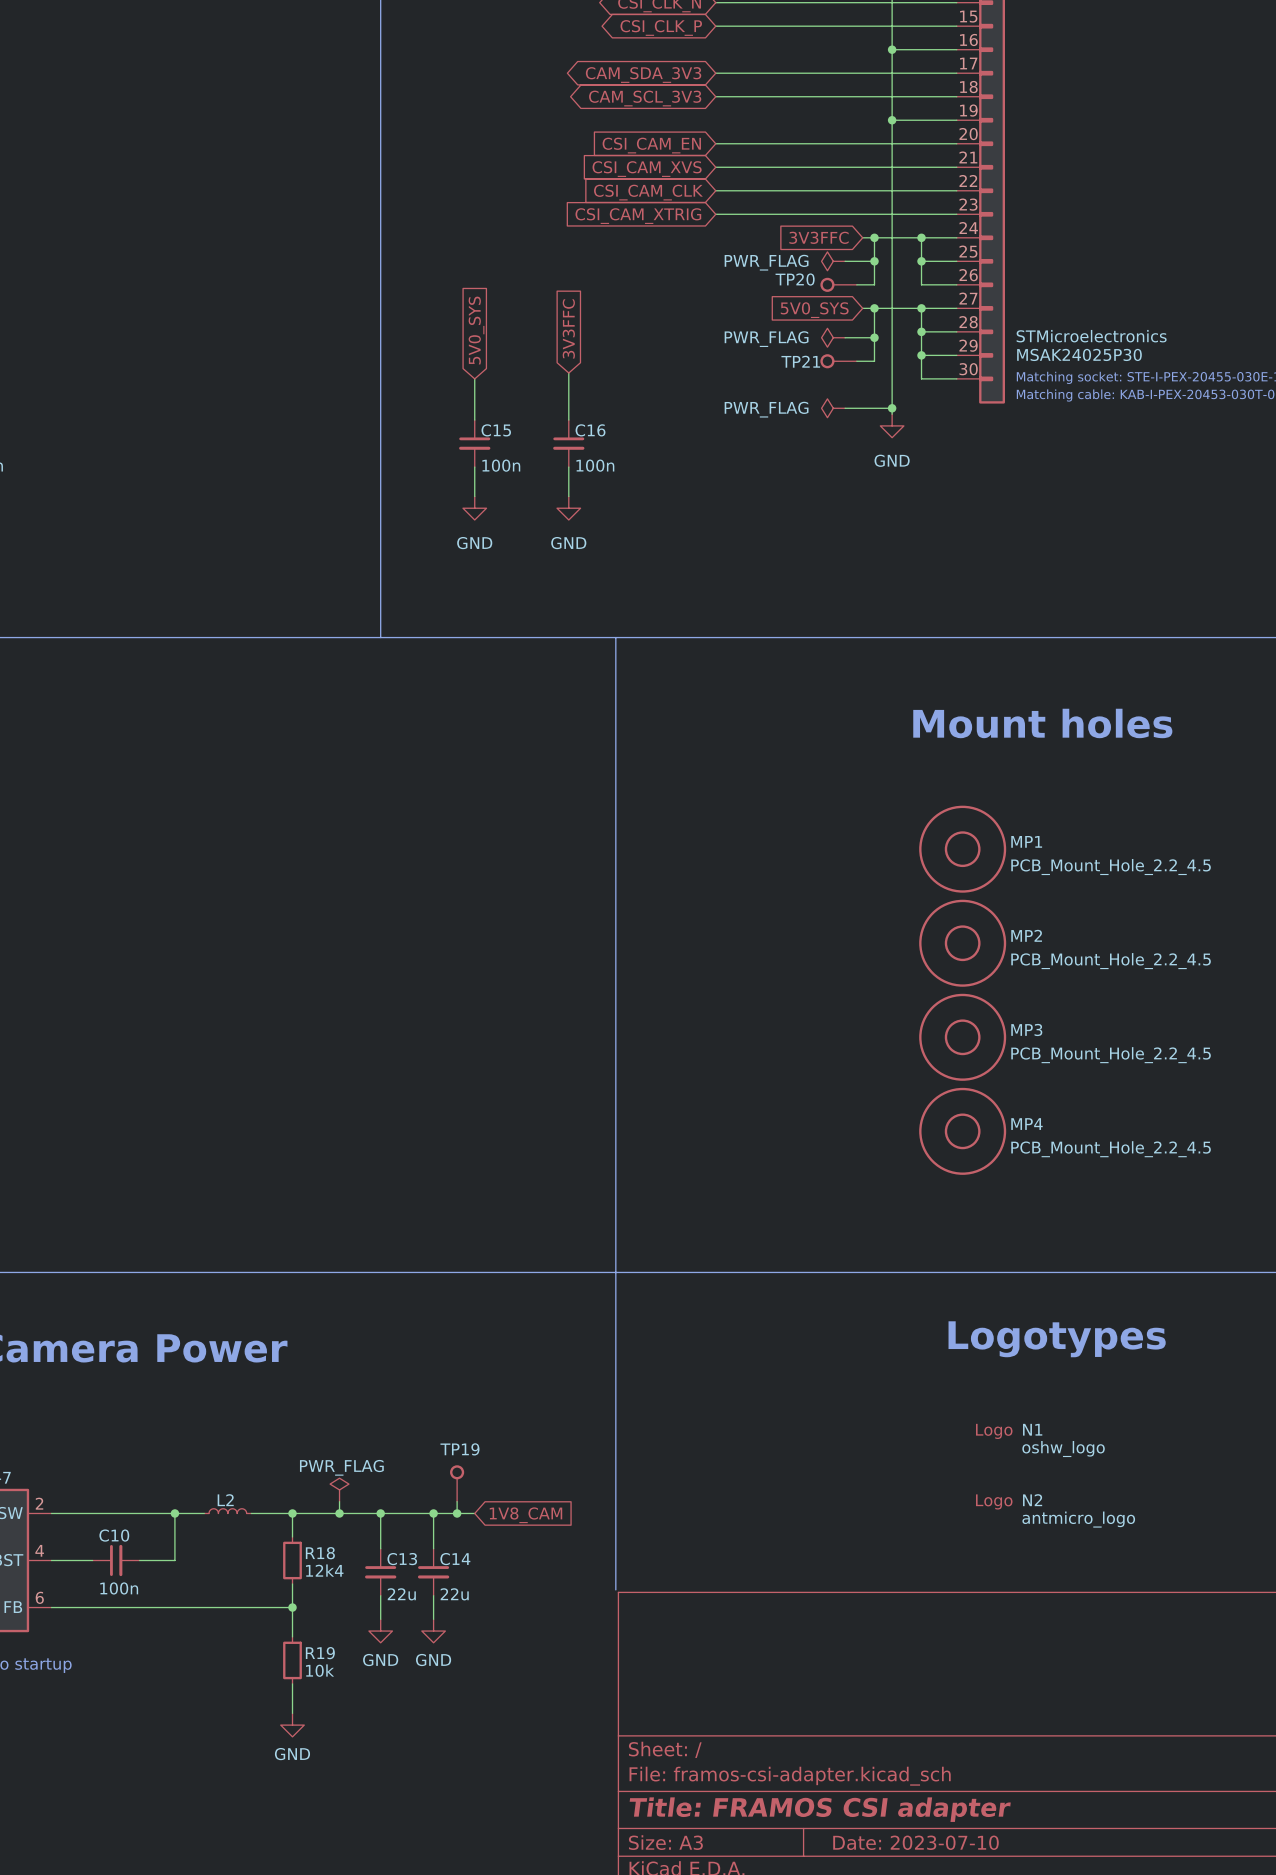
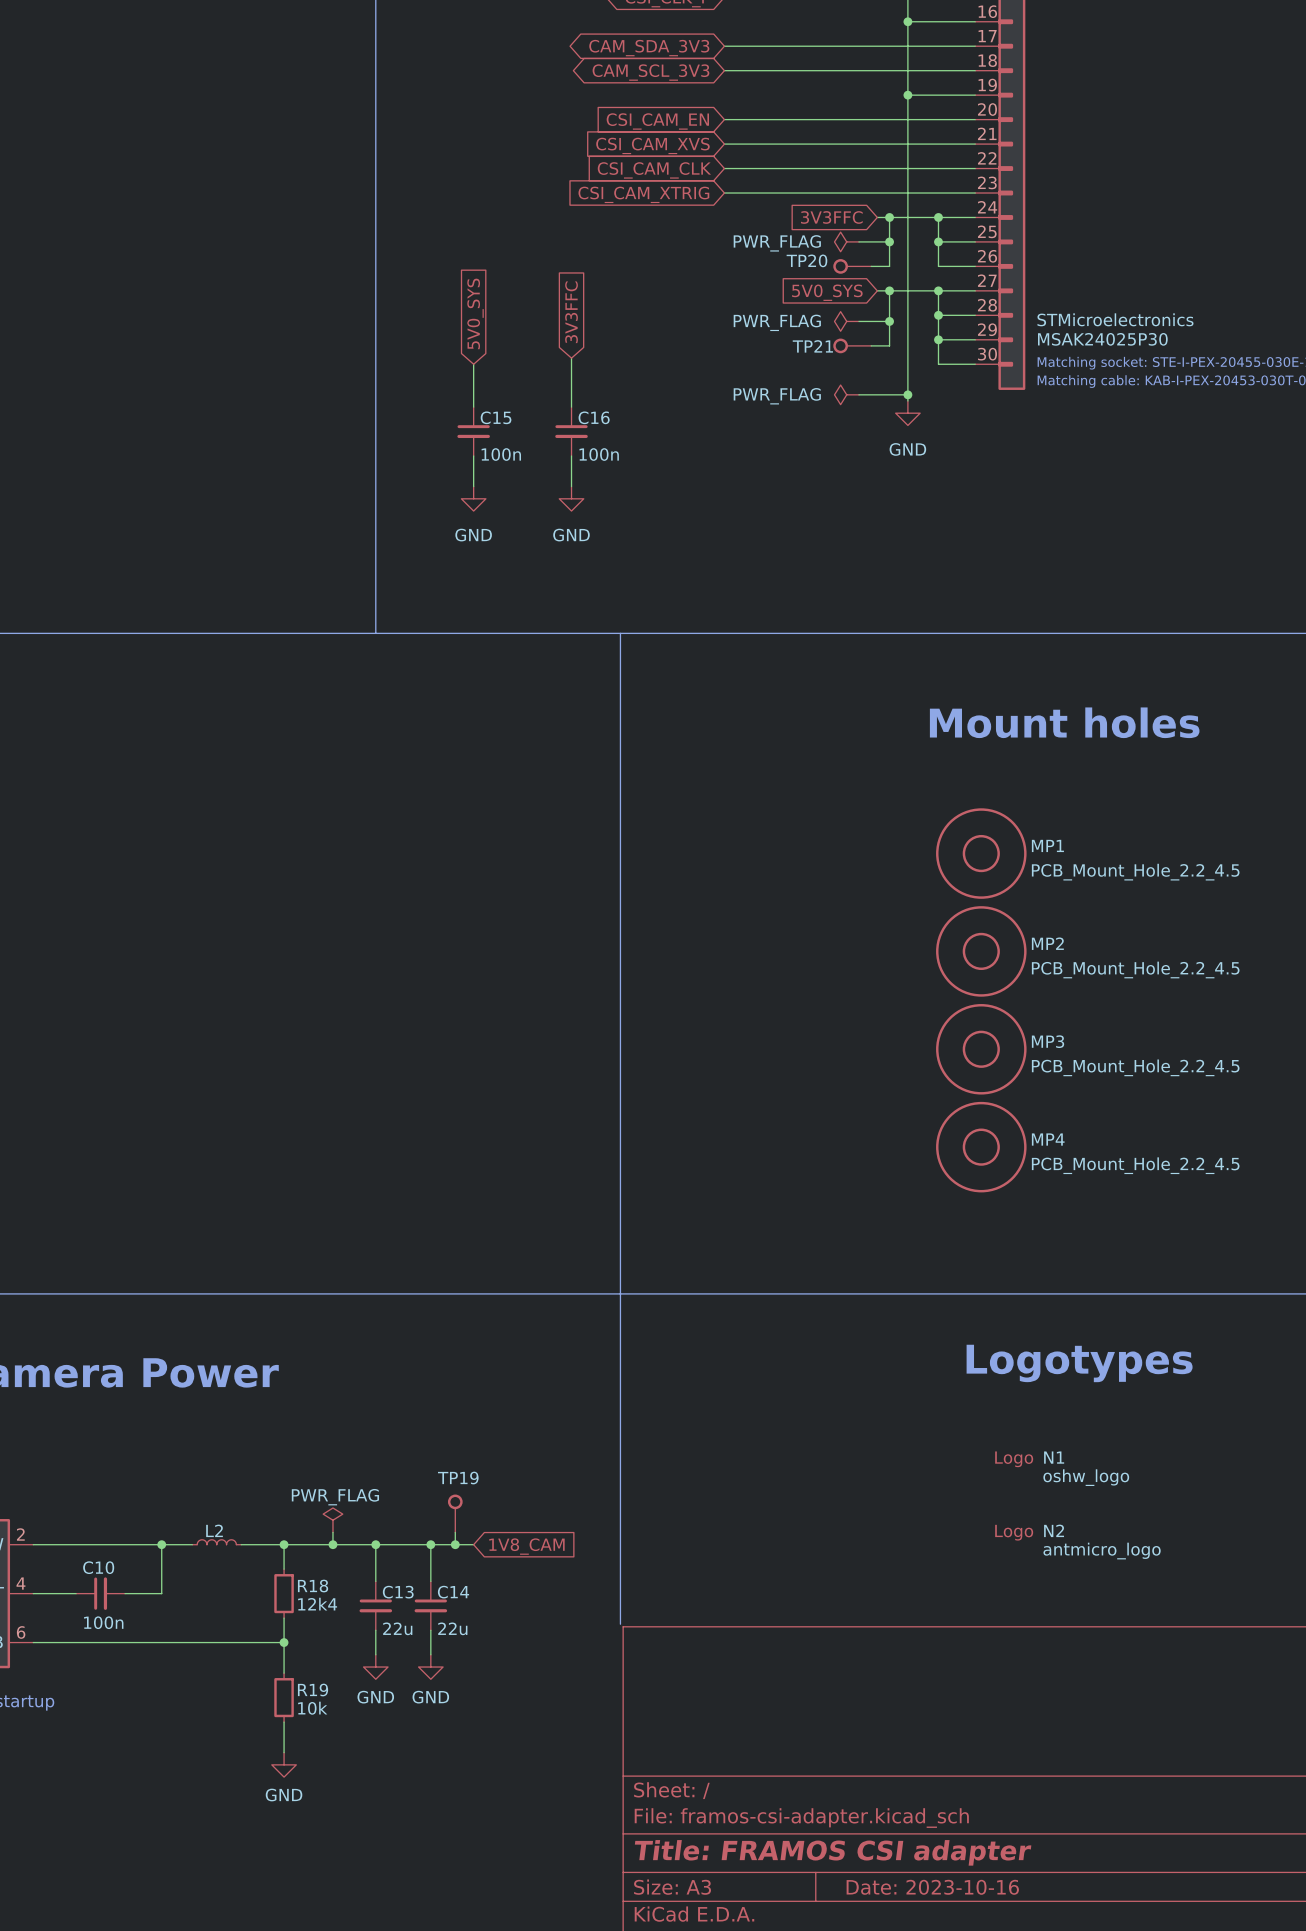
title block: Date: 2023-07-10 (915, 1842) -> Date: 2023-10-16 (932, 1887)

